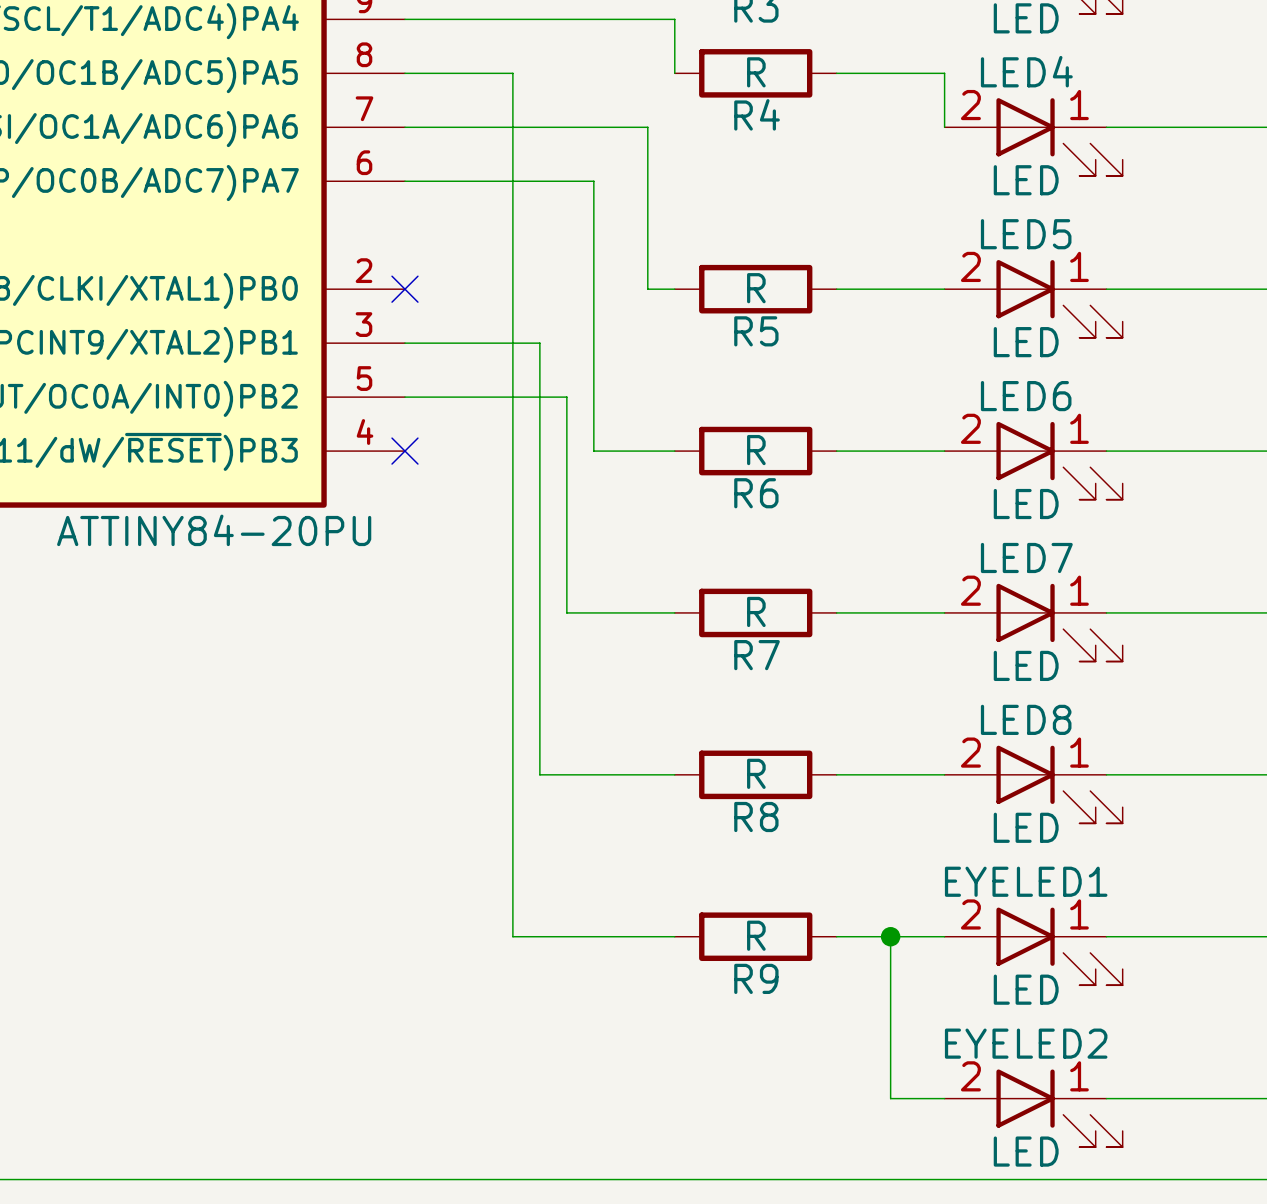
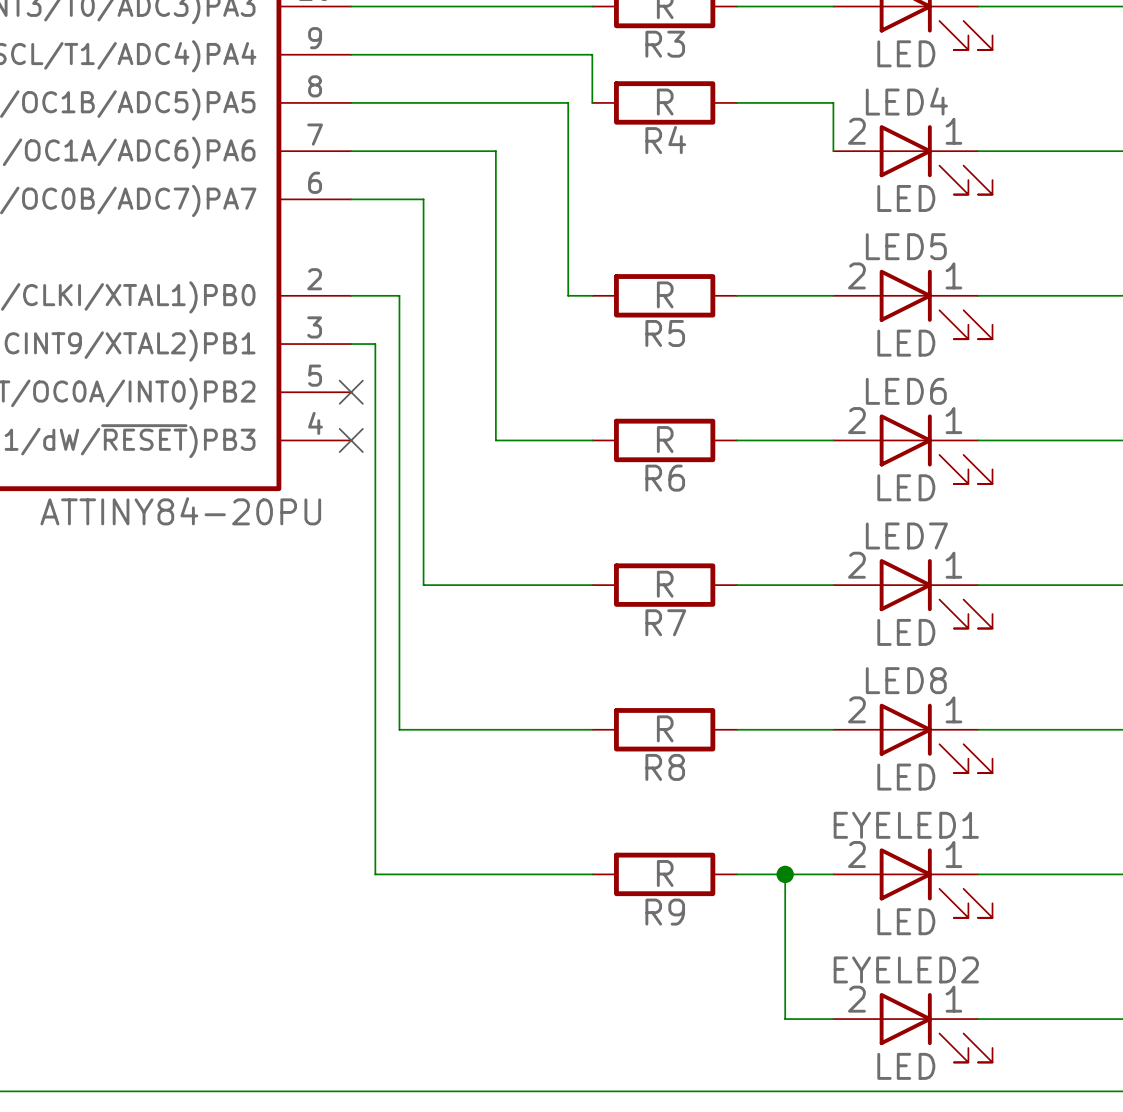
wire: (512, 73) (512, 936) -> (375, 344) (375, 874) (447, 874)
wire: (566, 127) (647, 127) -> (447, 102) (568, 102) (568, 151)
wire: (485, 181) (593, 181) (593, 451) -> (423, 199) (423, 585) (495, 585)
no-connect mark position: (404, 289) -> (351, 392)
wire: (431, 343) (539, 343) (539, 774) -> (351, 295) (399, 295) (399, 729) (471, 729)
wire: (404, 397) (566, 397) -> (495, 151) (495, 392)
wire: (566, 451) (566, 612) -> (495, 440) (520, 440)

